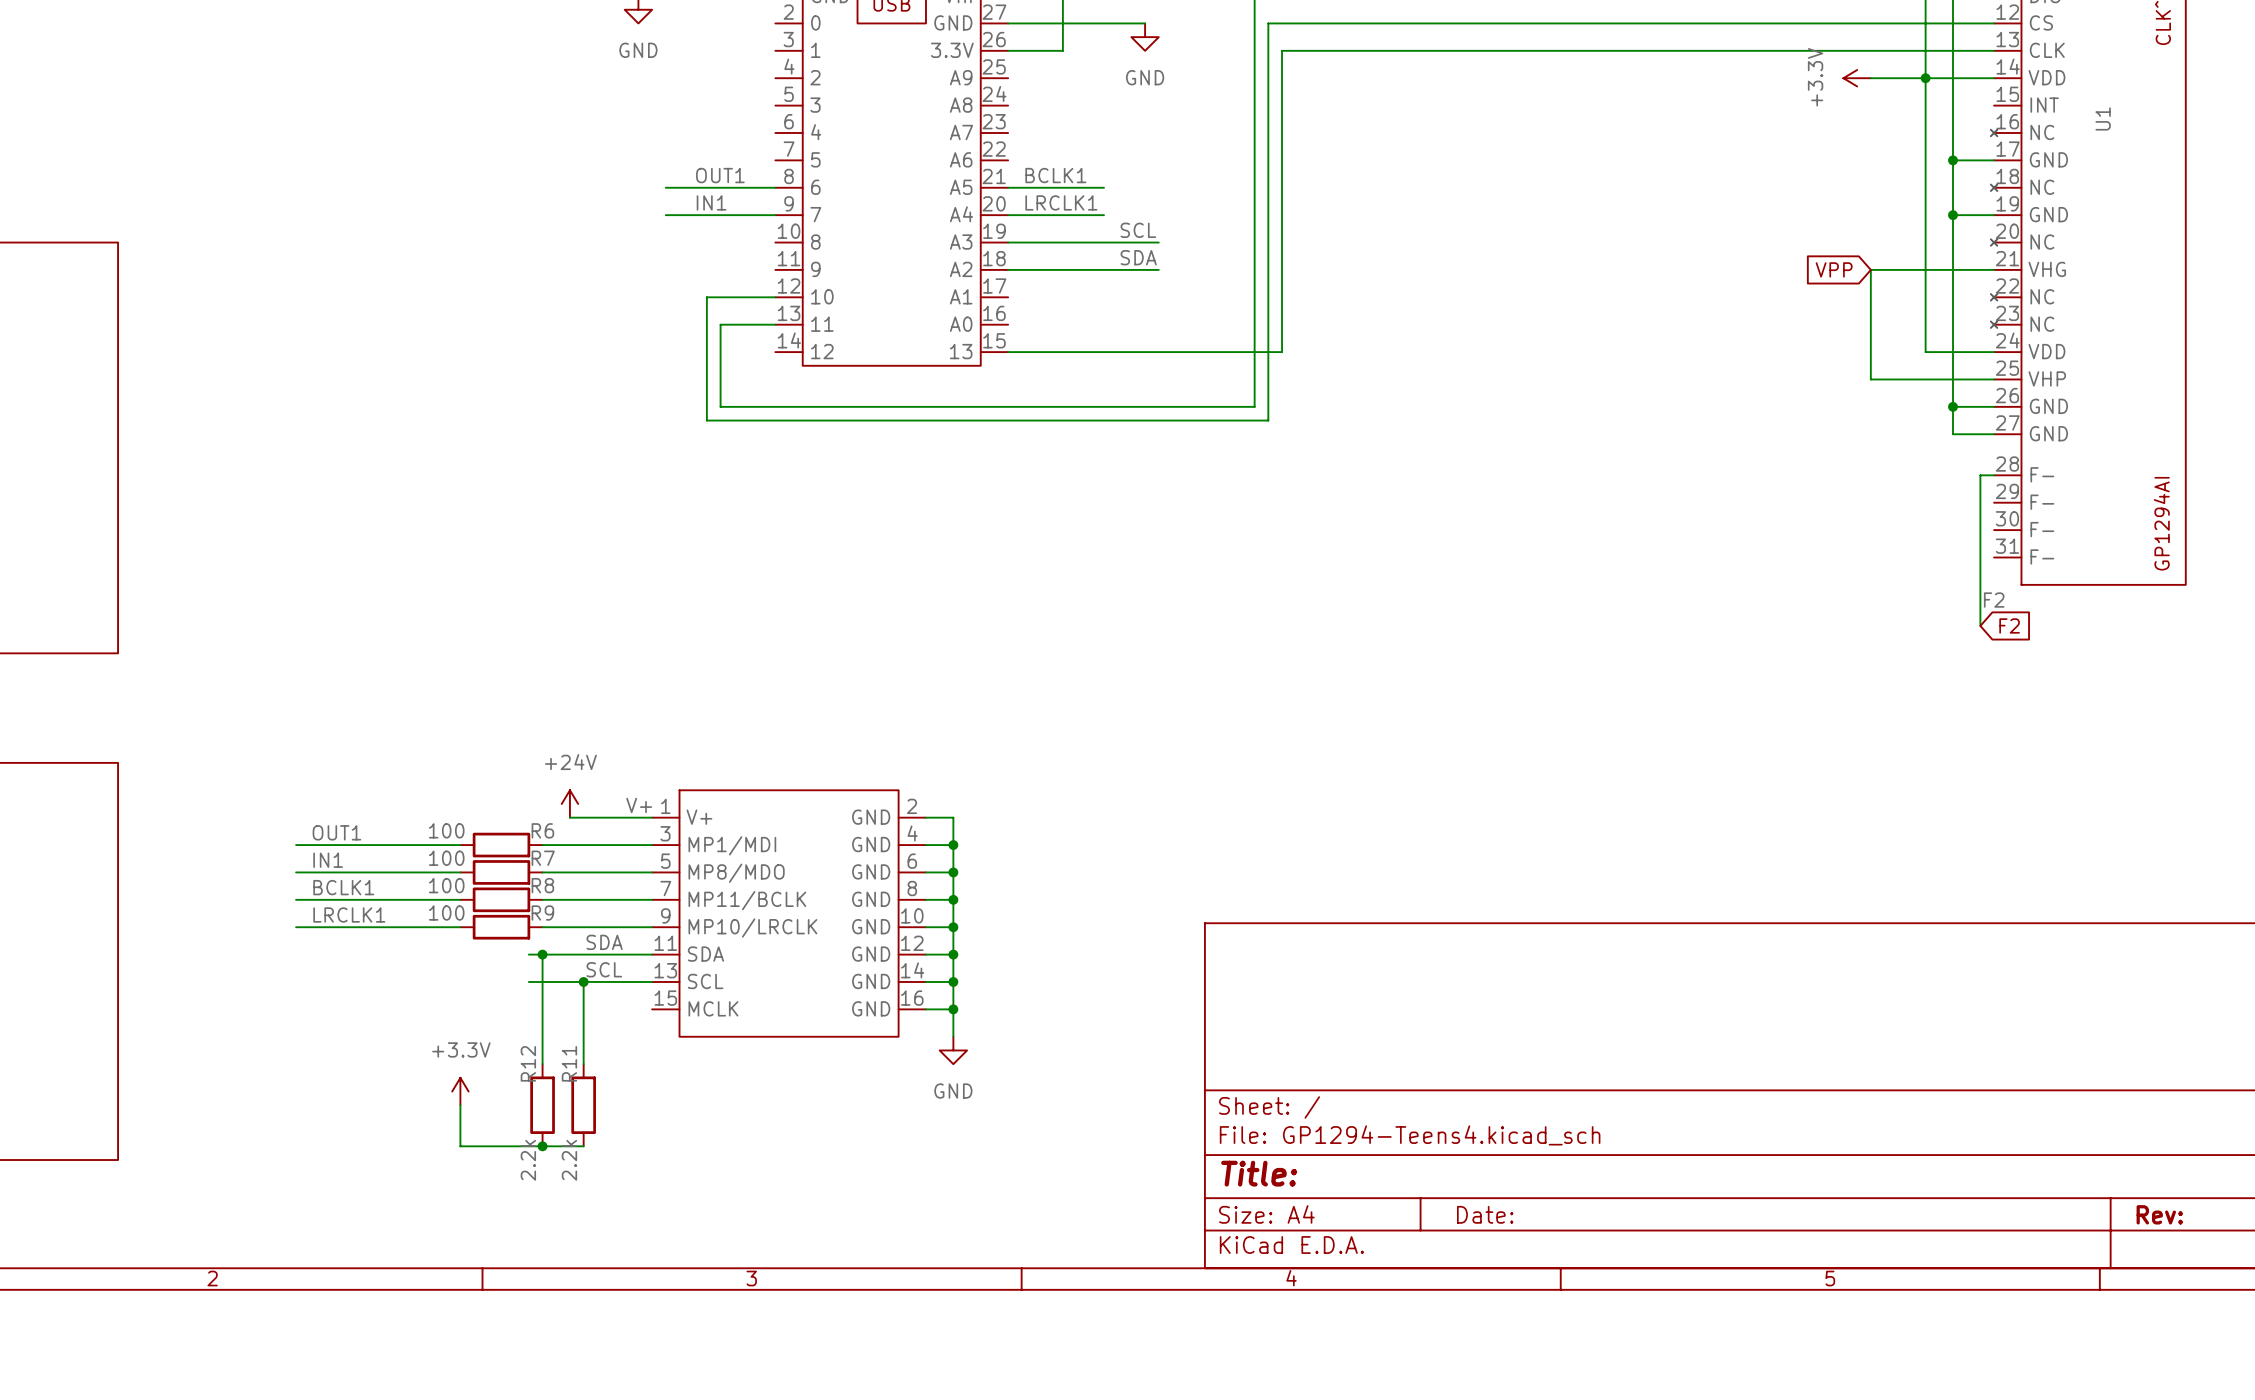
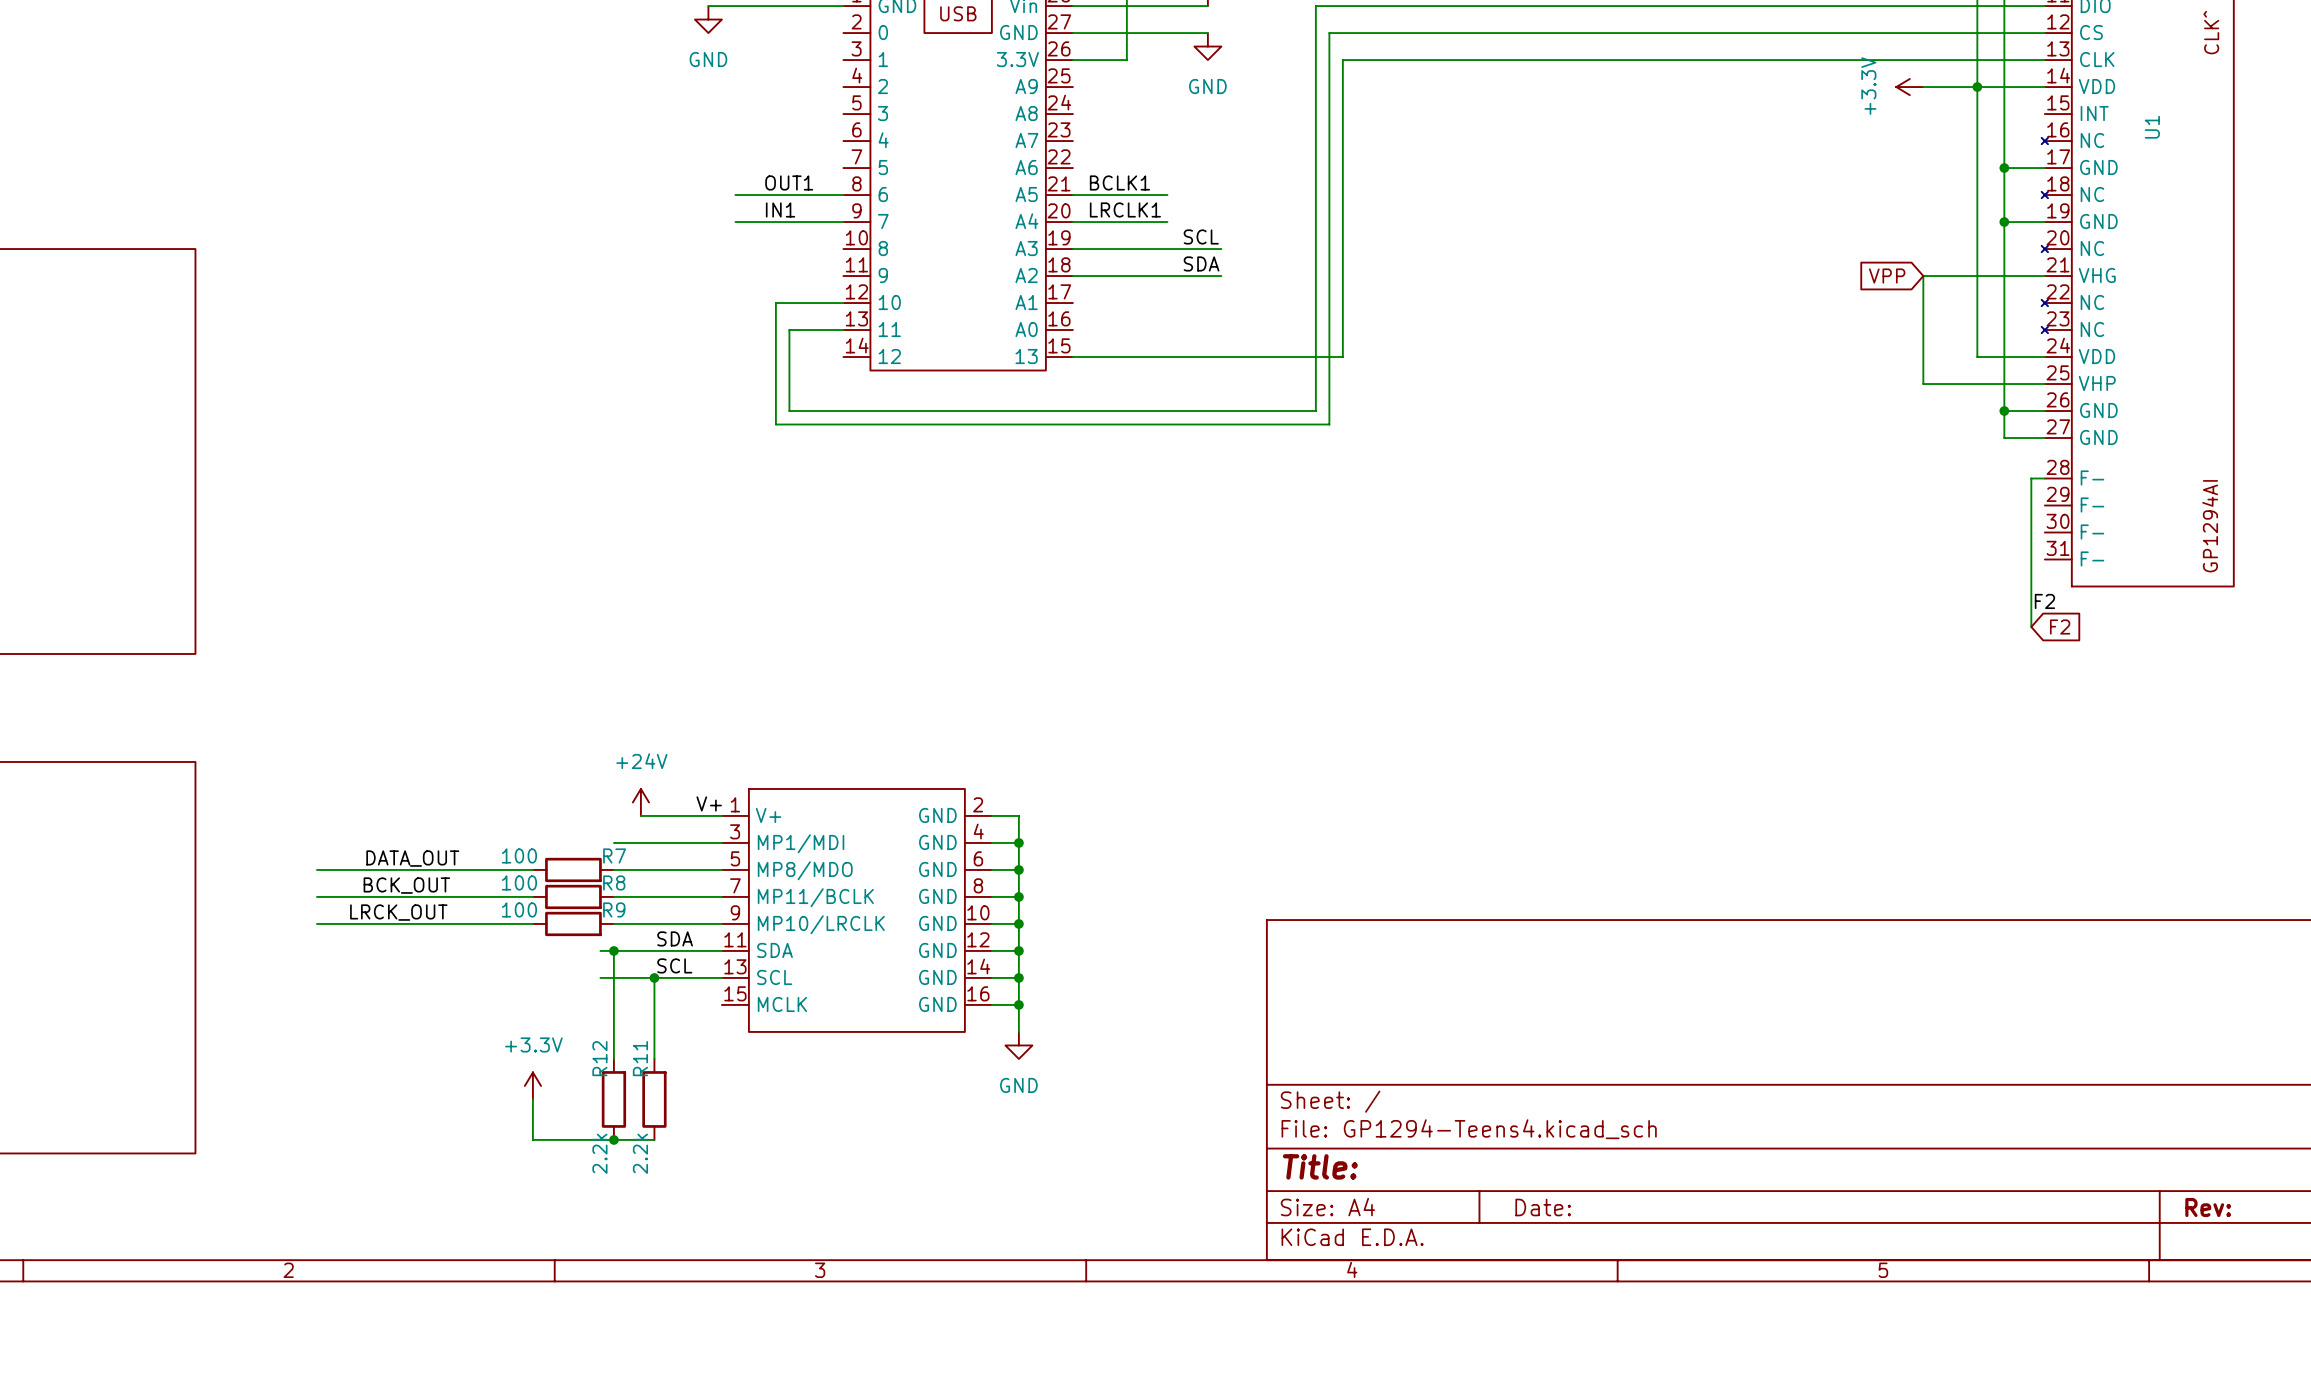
label: OUT1 (336, 832) -> none
wire: (296, 845) (460, 845) -> none
R6: 100 (501, 845) -> none
label: IN1 (328, 860) -> none
label: none -> DATA_OUT (412, 858)
wire: none -> (316, 869) (370, 869)
label: BCLK1 (343, 887) -> none
label: none -> BCK_OUT (406, 885)
wire: none -> (316, 896) (370, 896)
label: none -> LRCK_OUT (398, 912)
label: LRCLK1 (349, 915) -> none
wire: none -> (316, 923) (370, 923)

